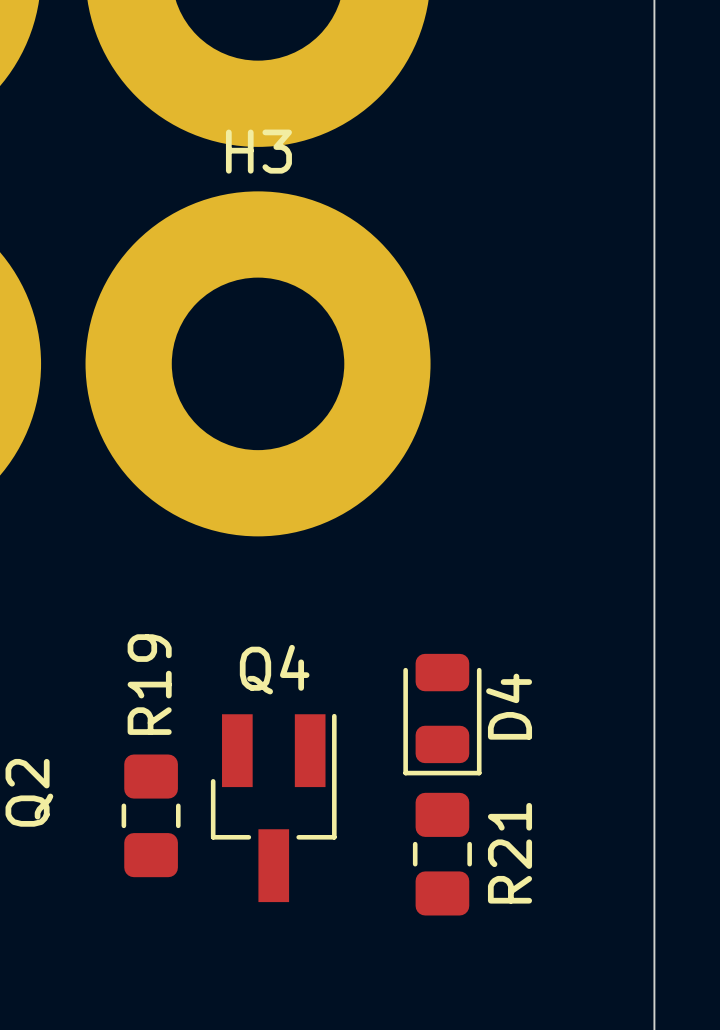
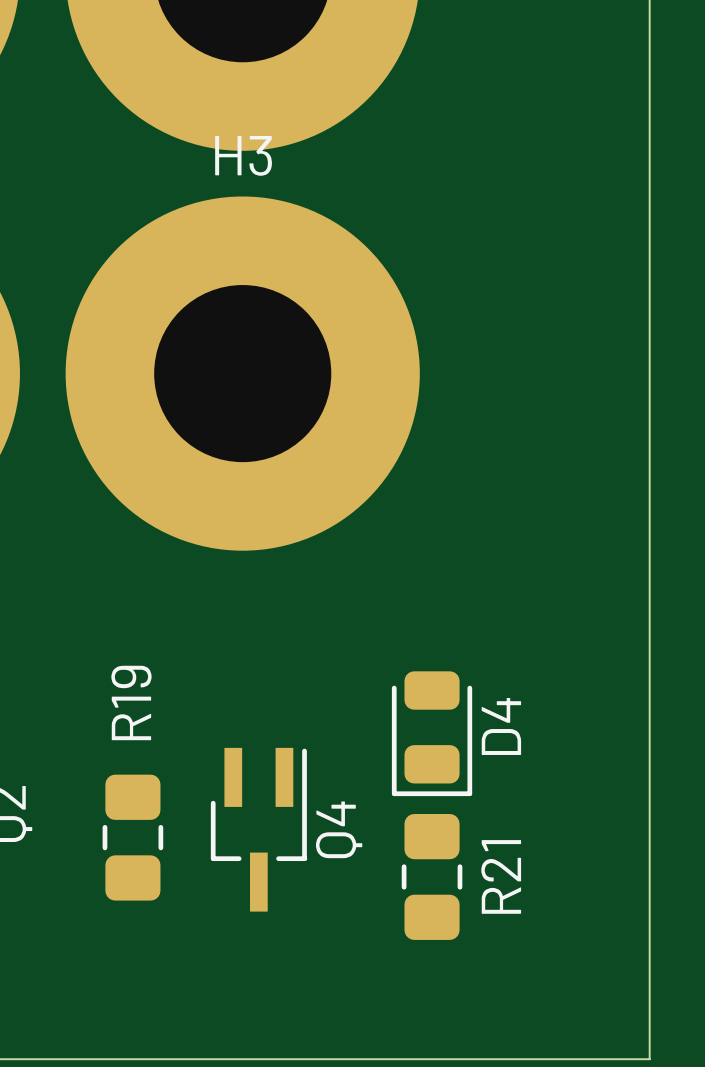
Q4 name rotation: 0° (274, 669) -> 90° counterclockwise (339, 829)
Q4 name position: Q4 (274, 669) -> Q4 (339, 829)
Q4 footprint: [210, 713, 337, 903] -> [210, 747, 308, 912]

